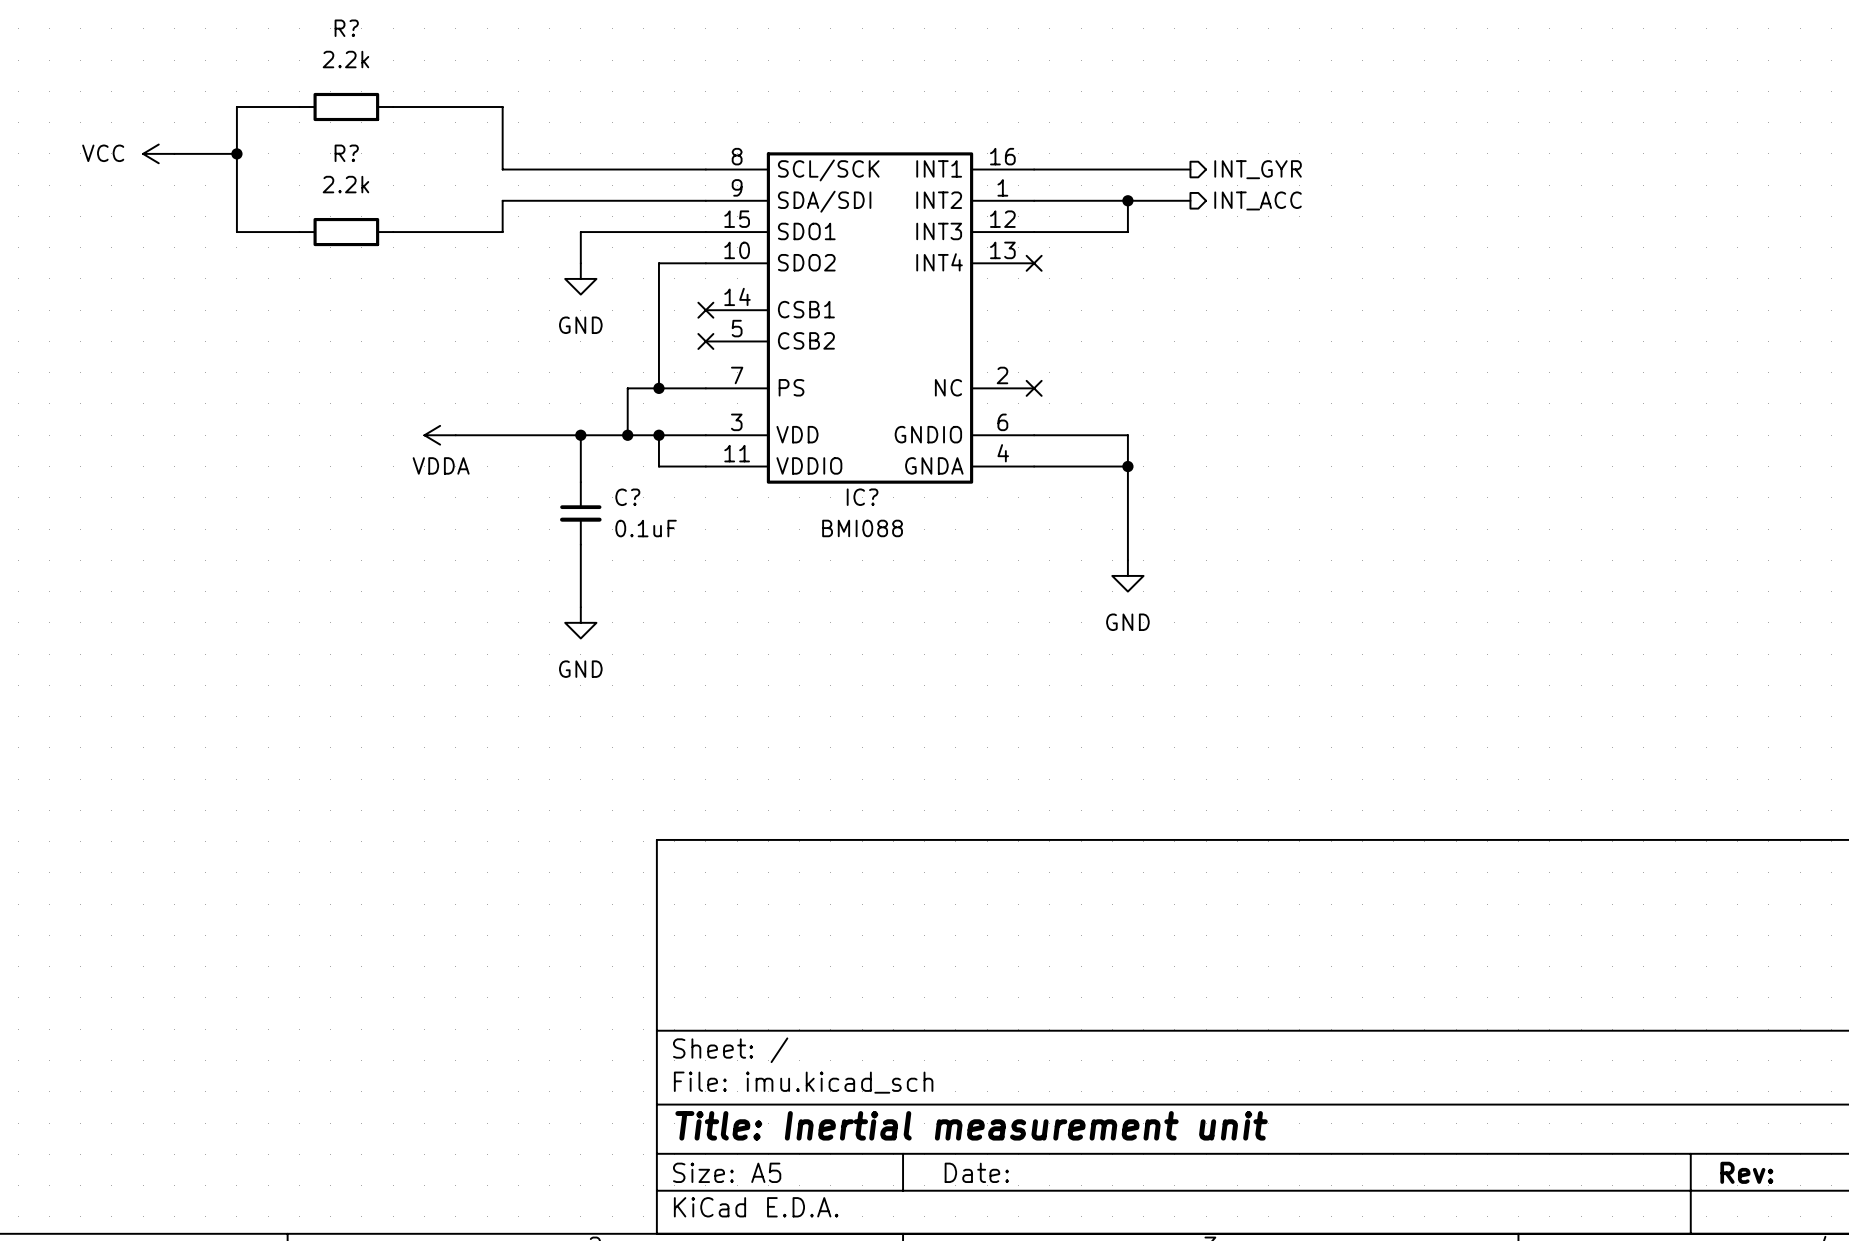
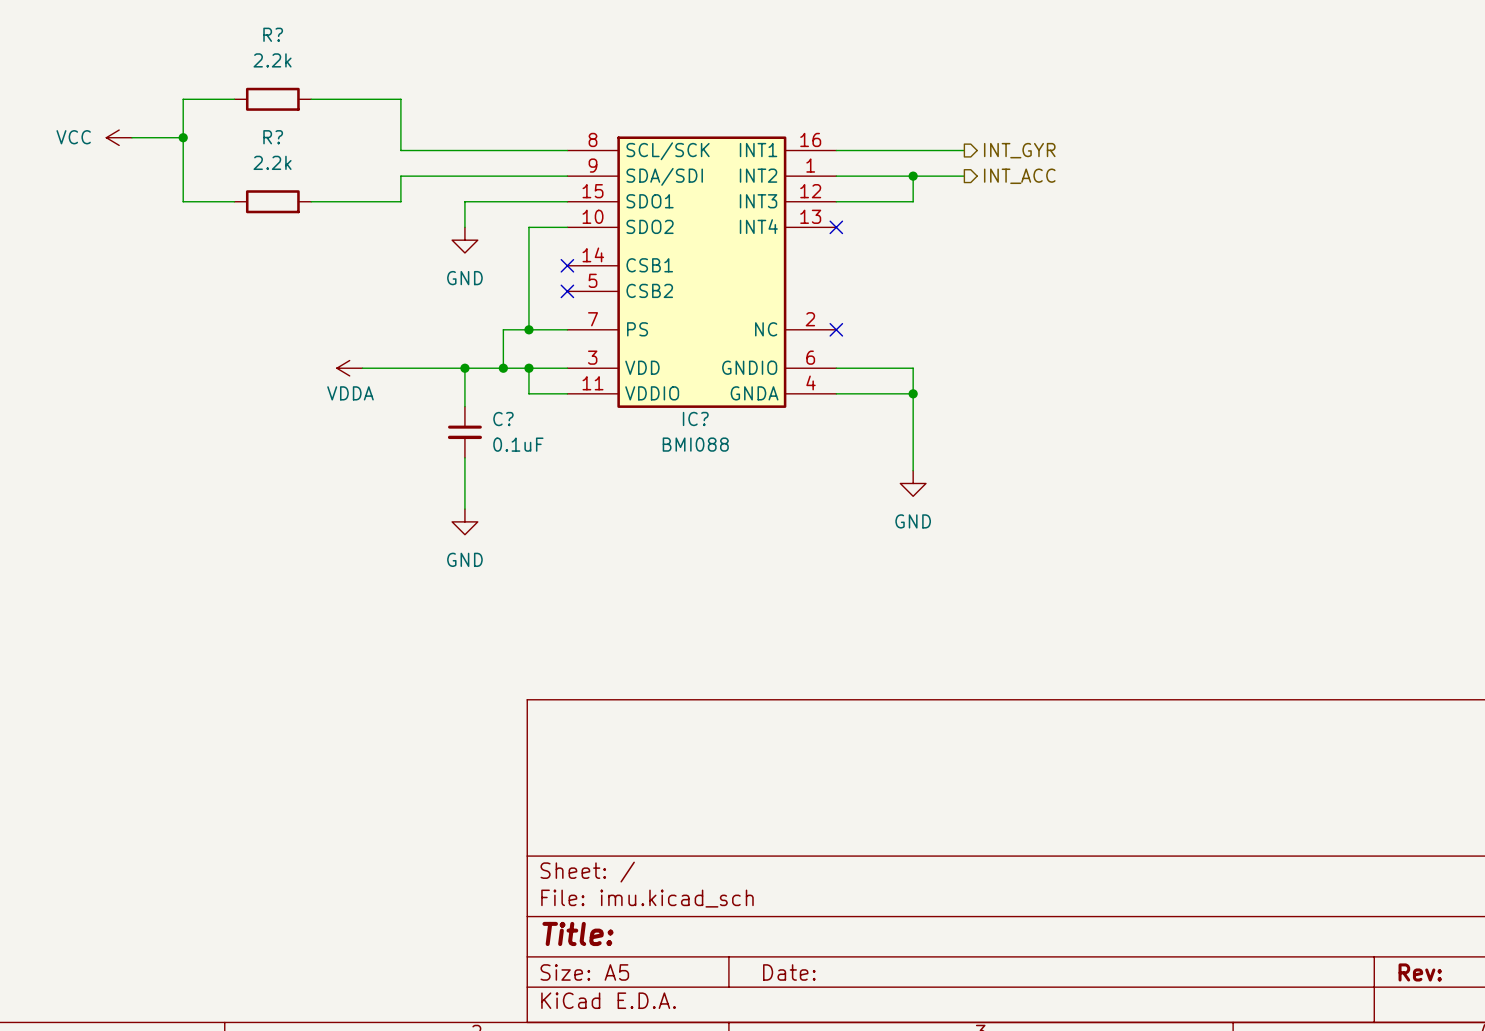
title block: Title: Inertial measurement unit (971, 1125) -> Title: (577, 933)

